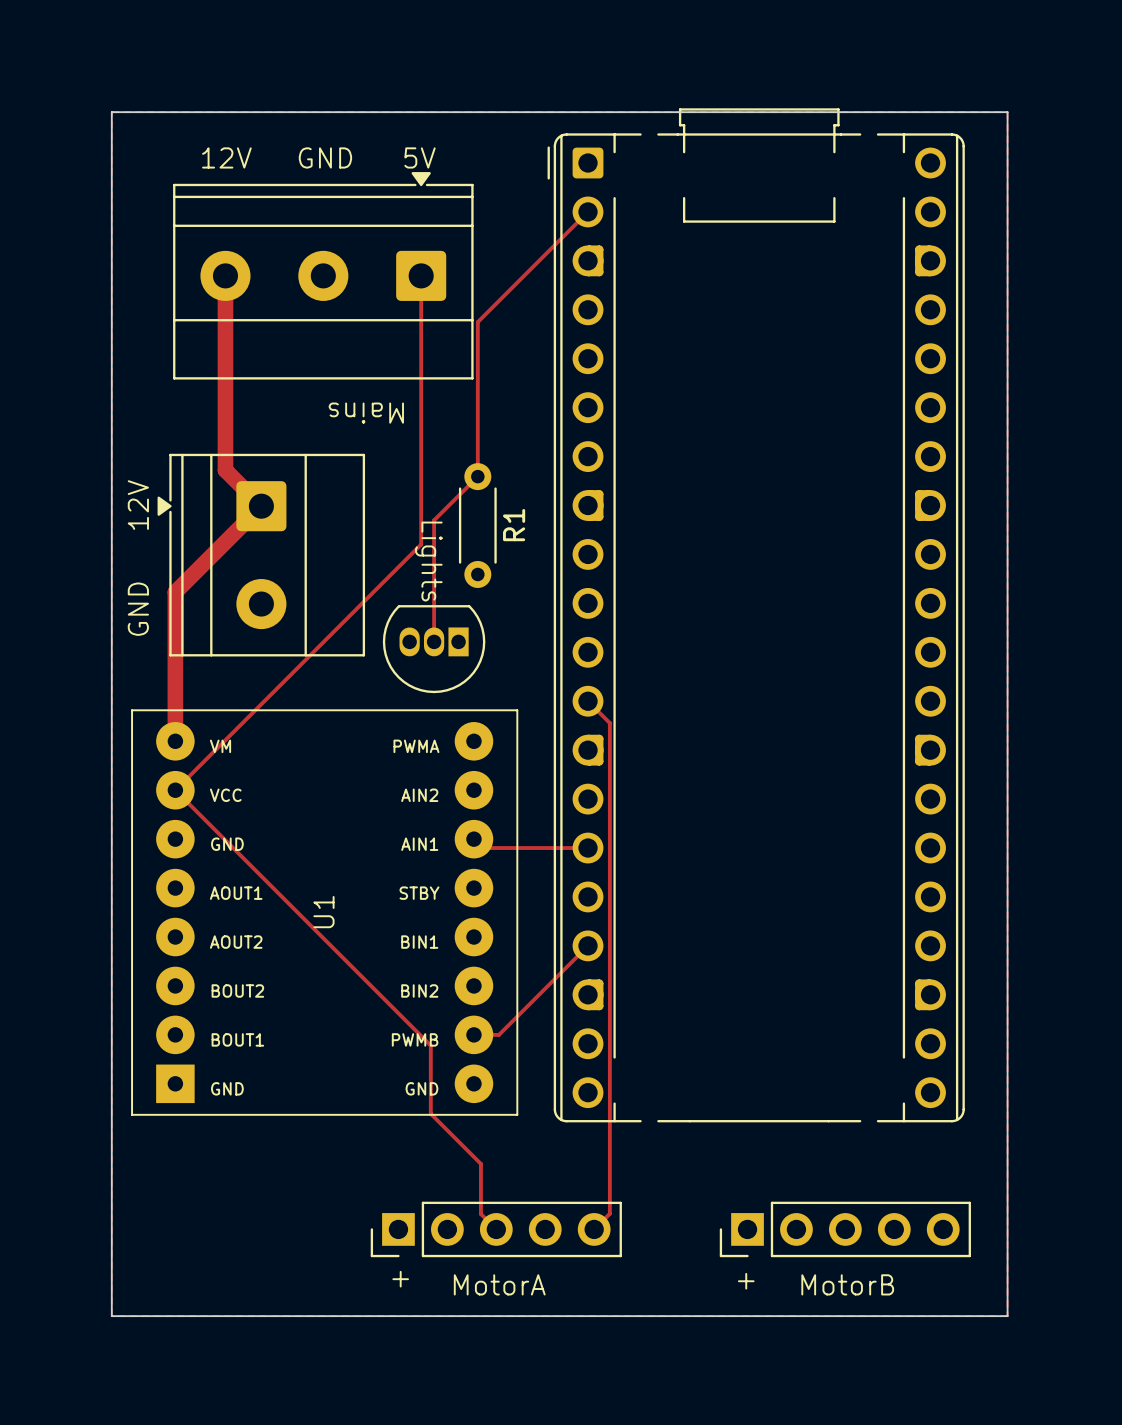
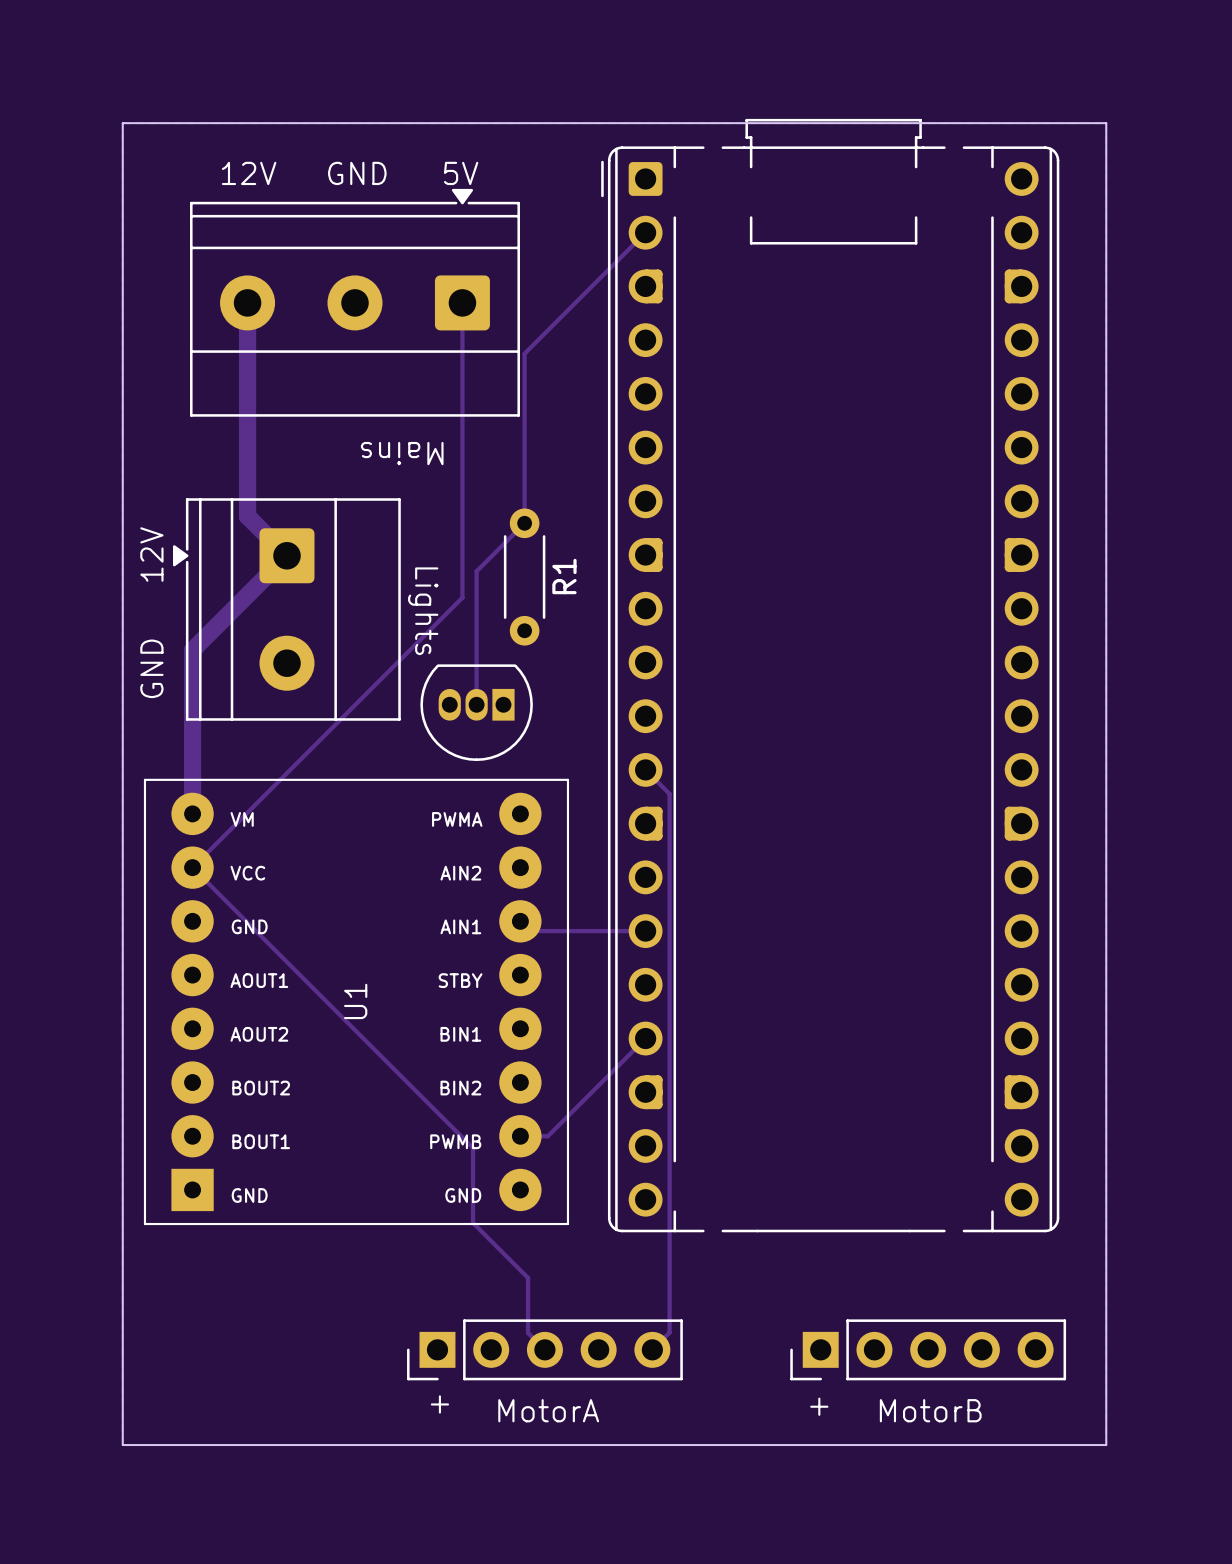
text position: Lights (428, 561) -> Lights (423, 611)

